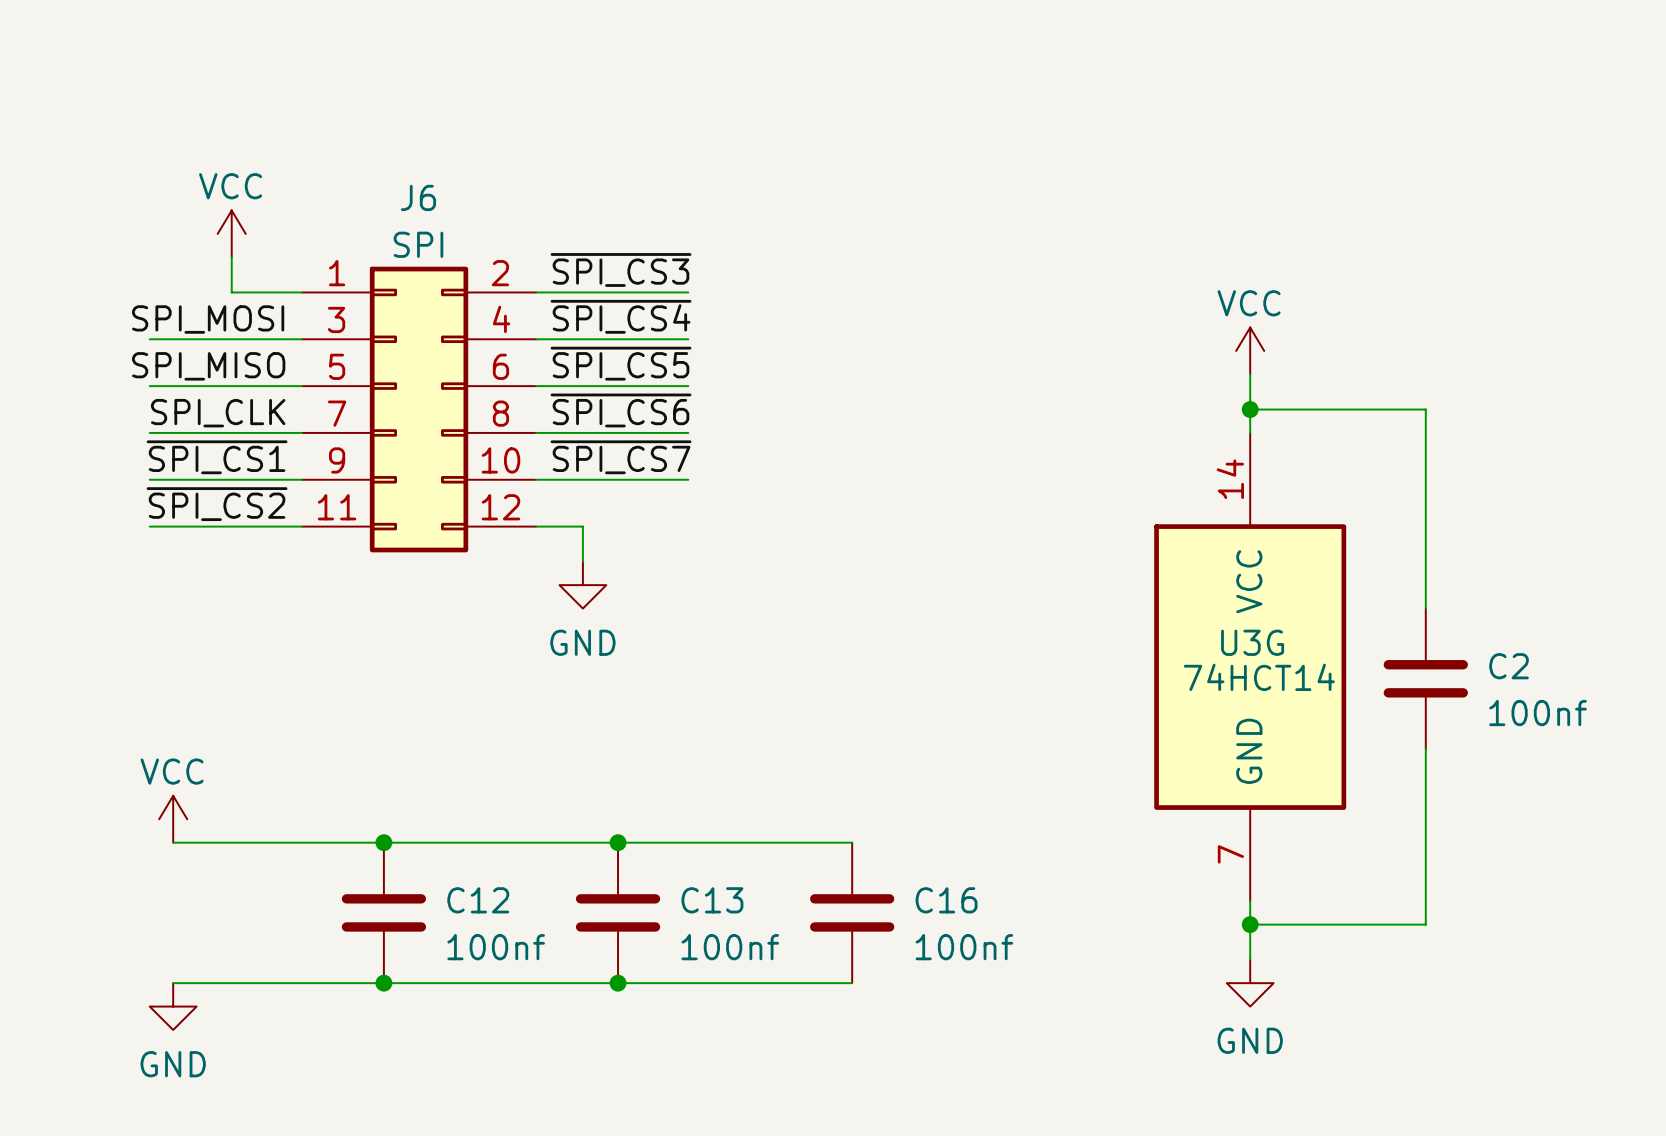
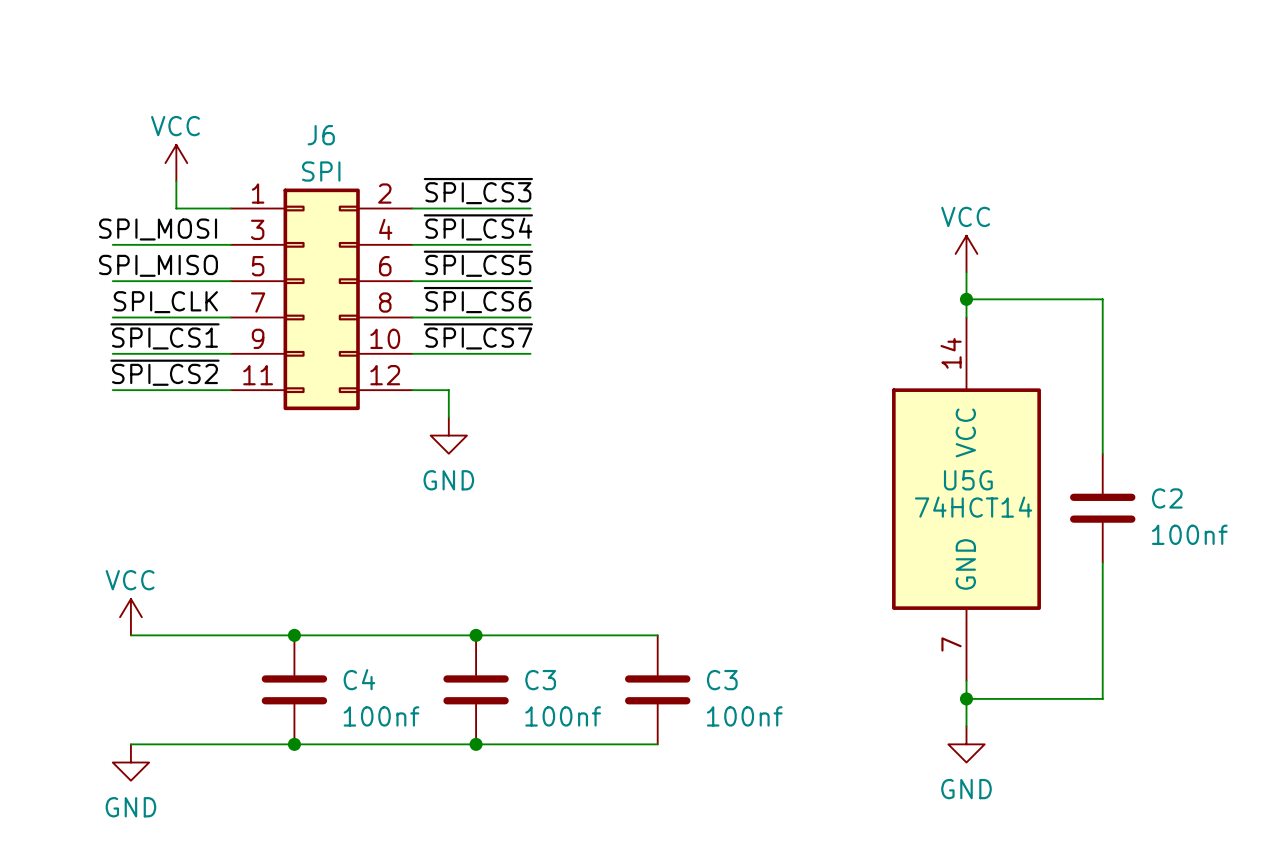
U3G name: U3G (1252, 642) -> U5G (968, 480)
C12 name: C12 (478, 900) -> C4 (359, 679)
C13 name: C13 (712, 900) -> C3 (540, 680)
C16 name: C16 (946, 900) -> C3 (722, 680)

